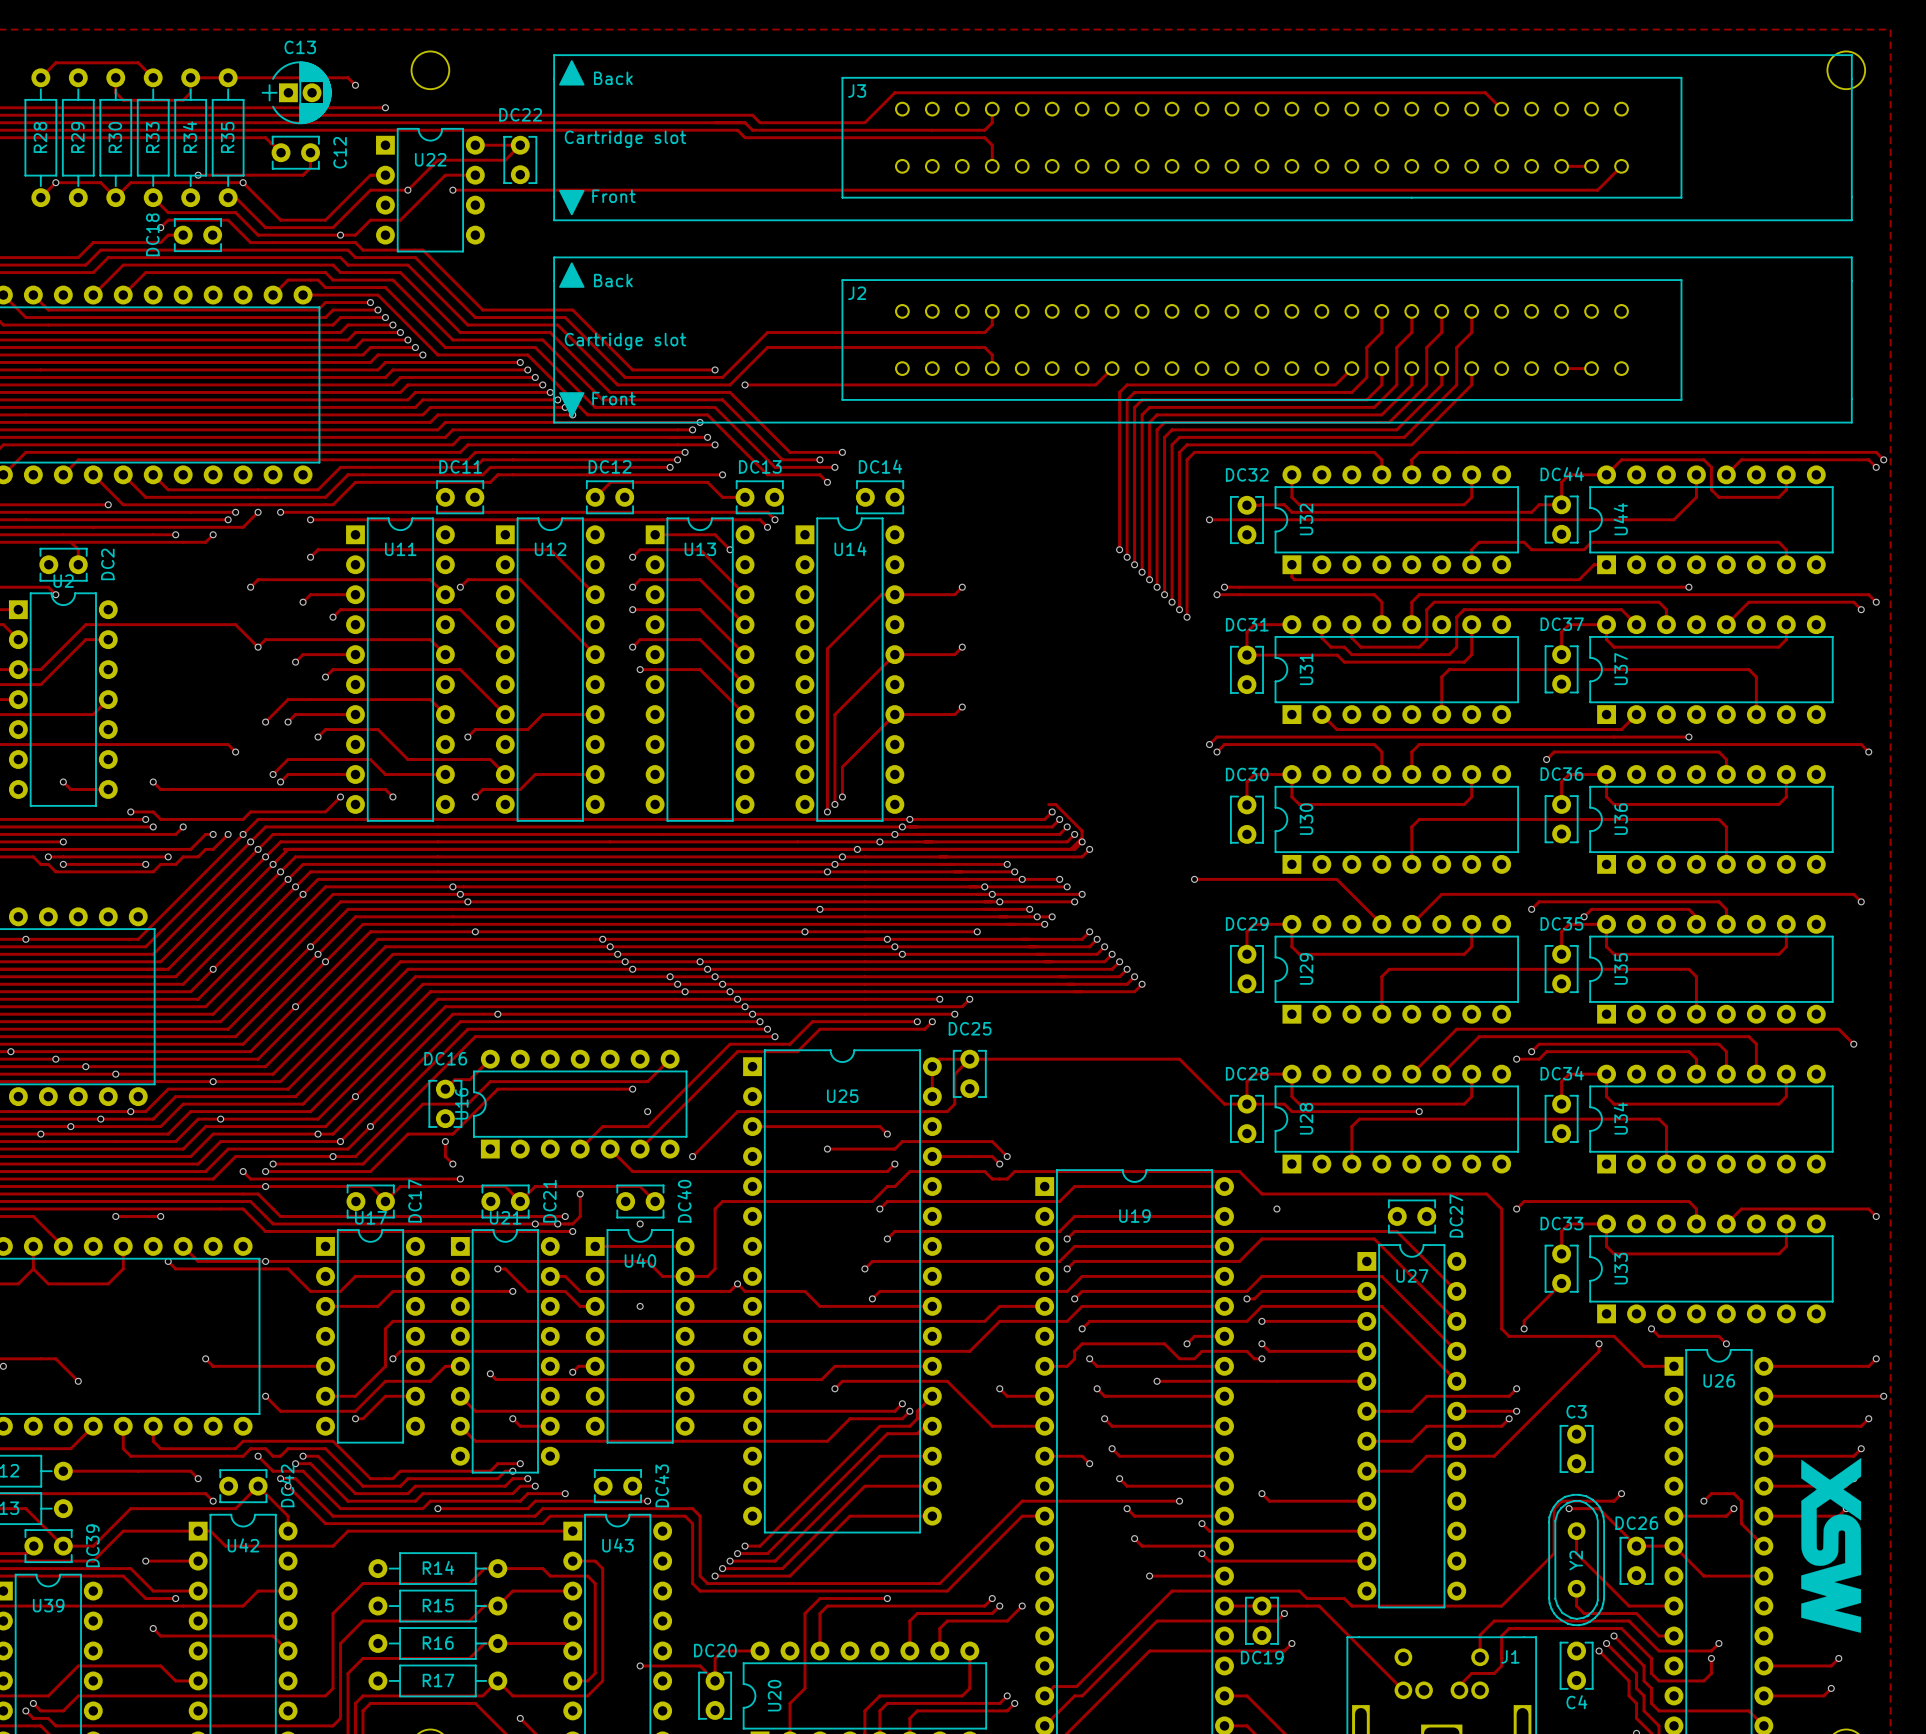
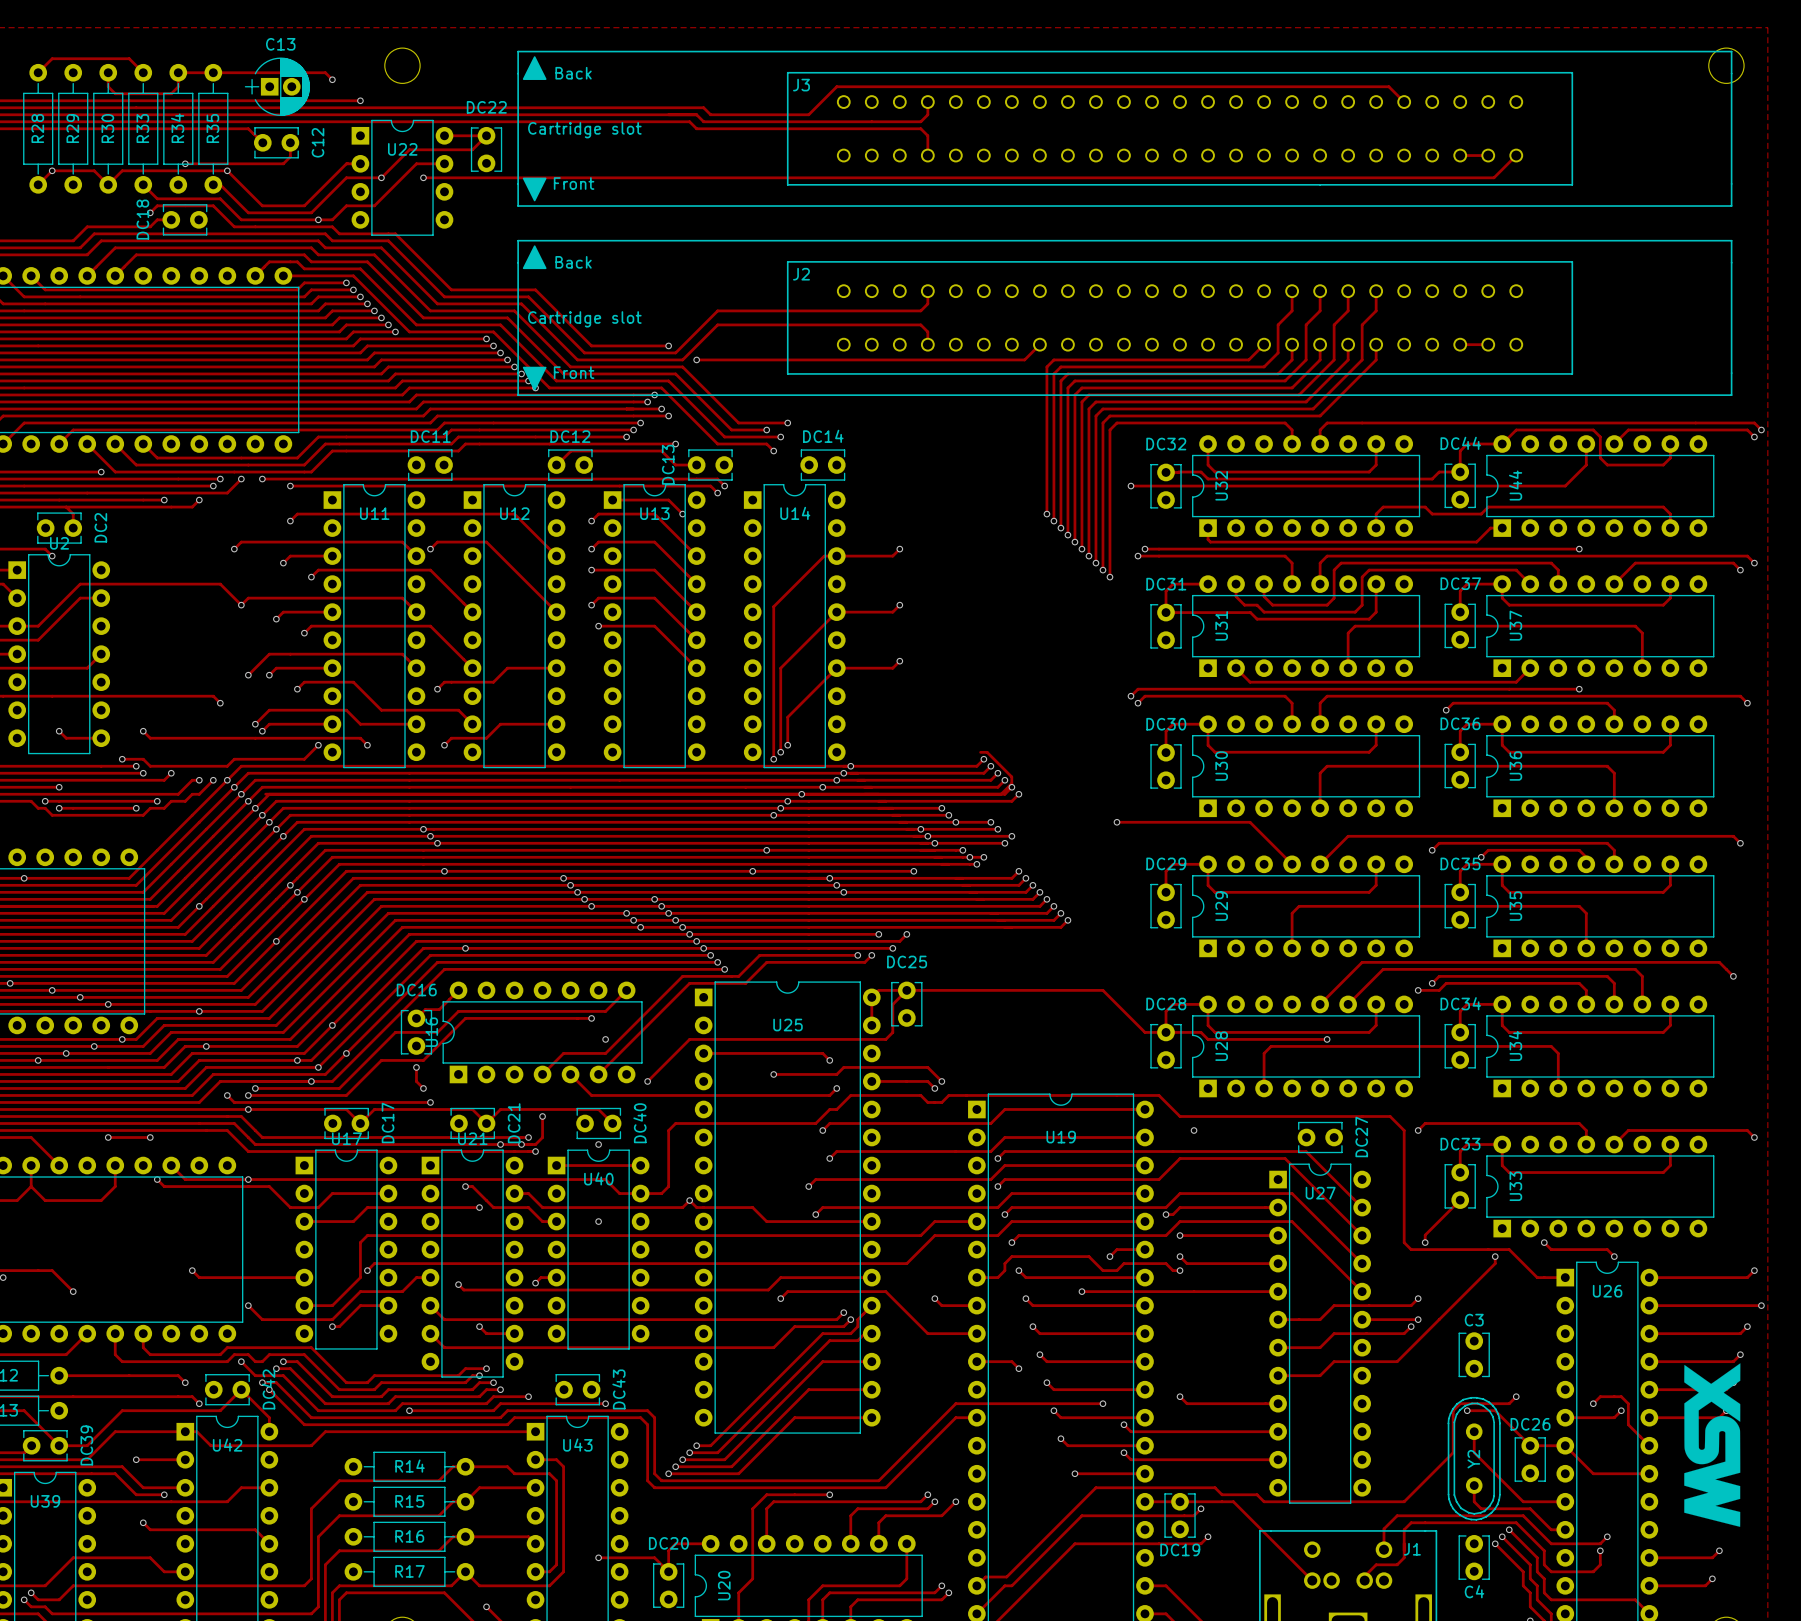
DC13 name rotation: 0° (760, 466) -> 90° counterclockwise (668, 464)

